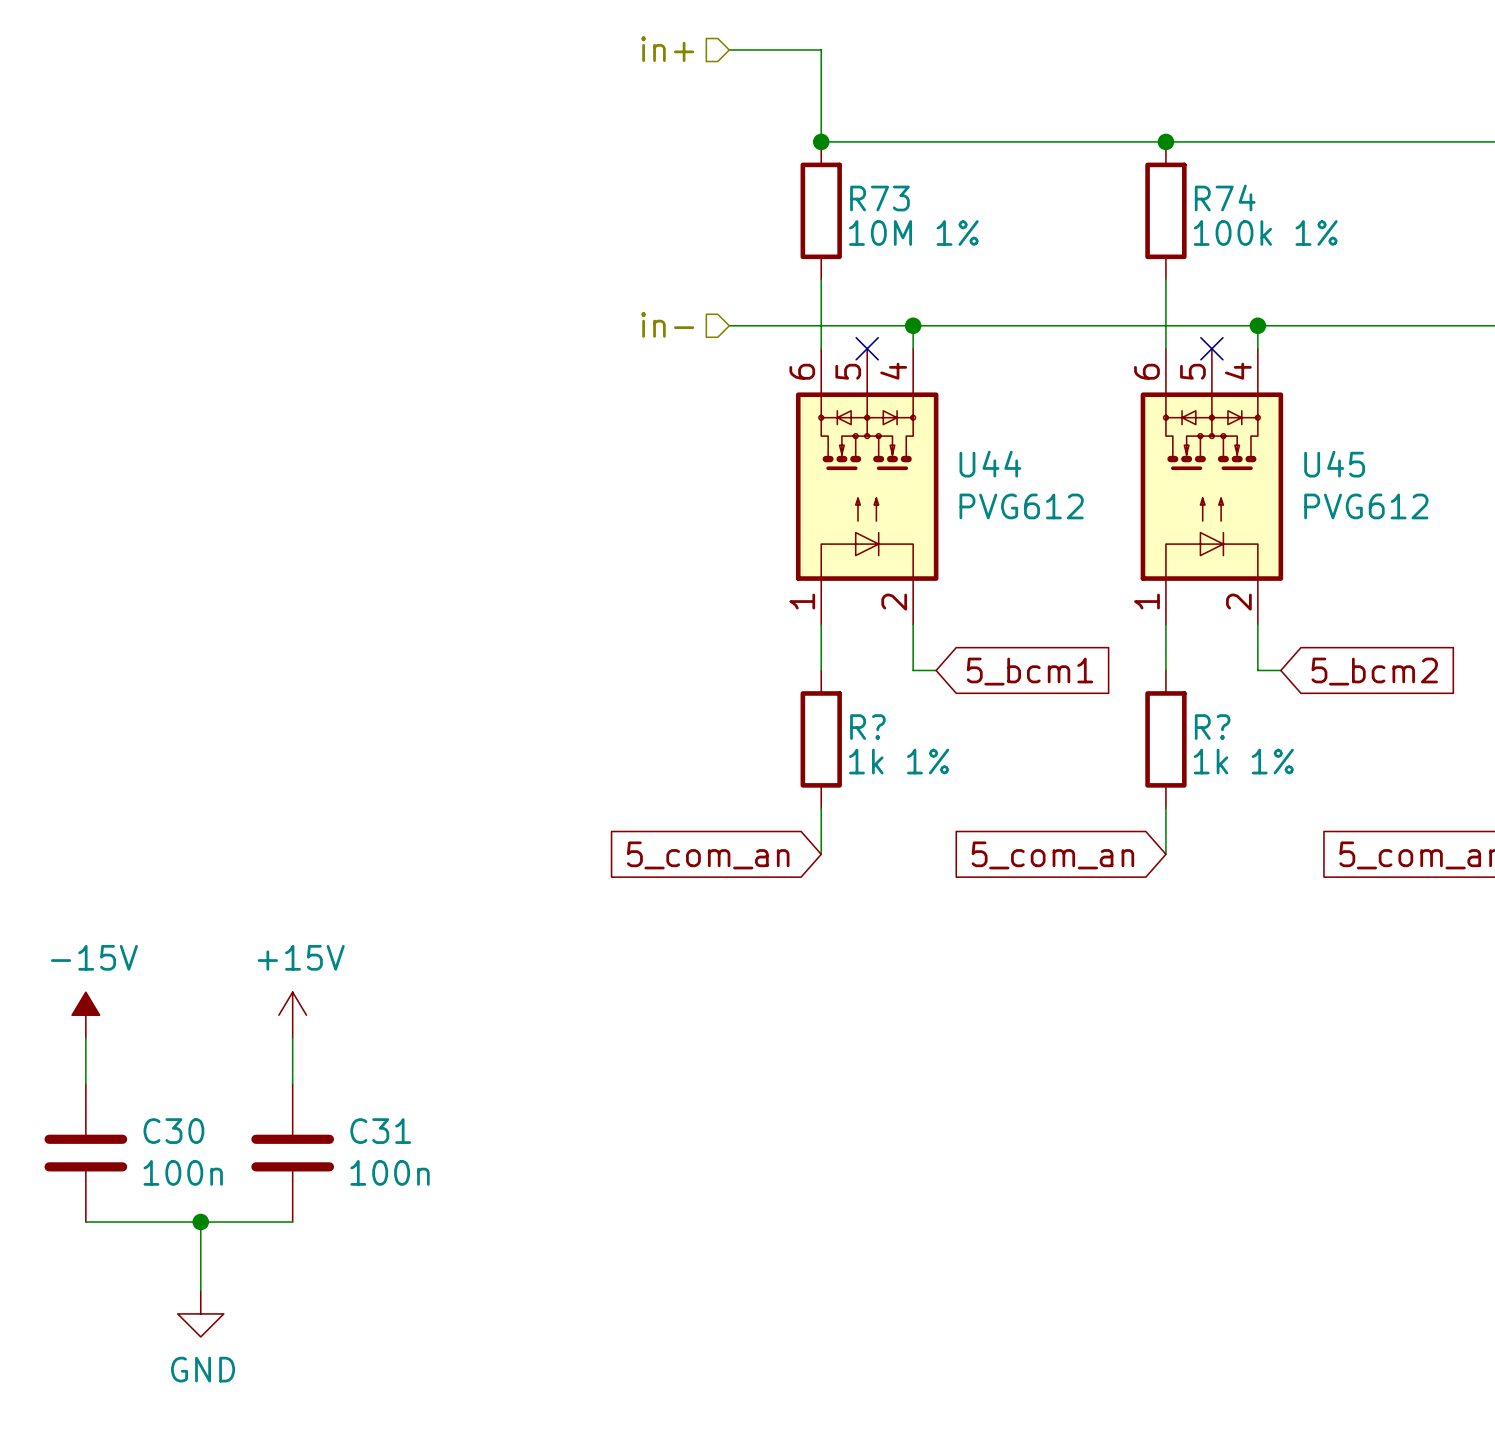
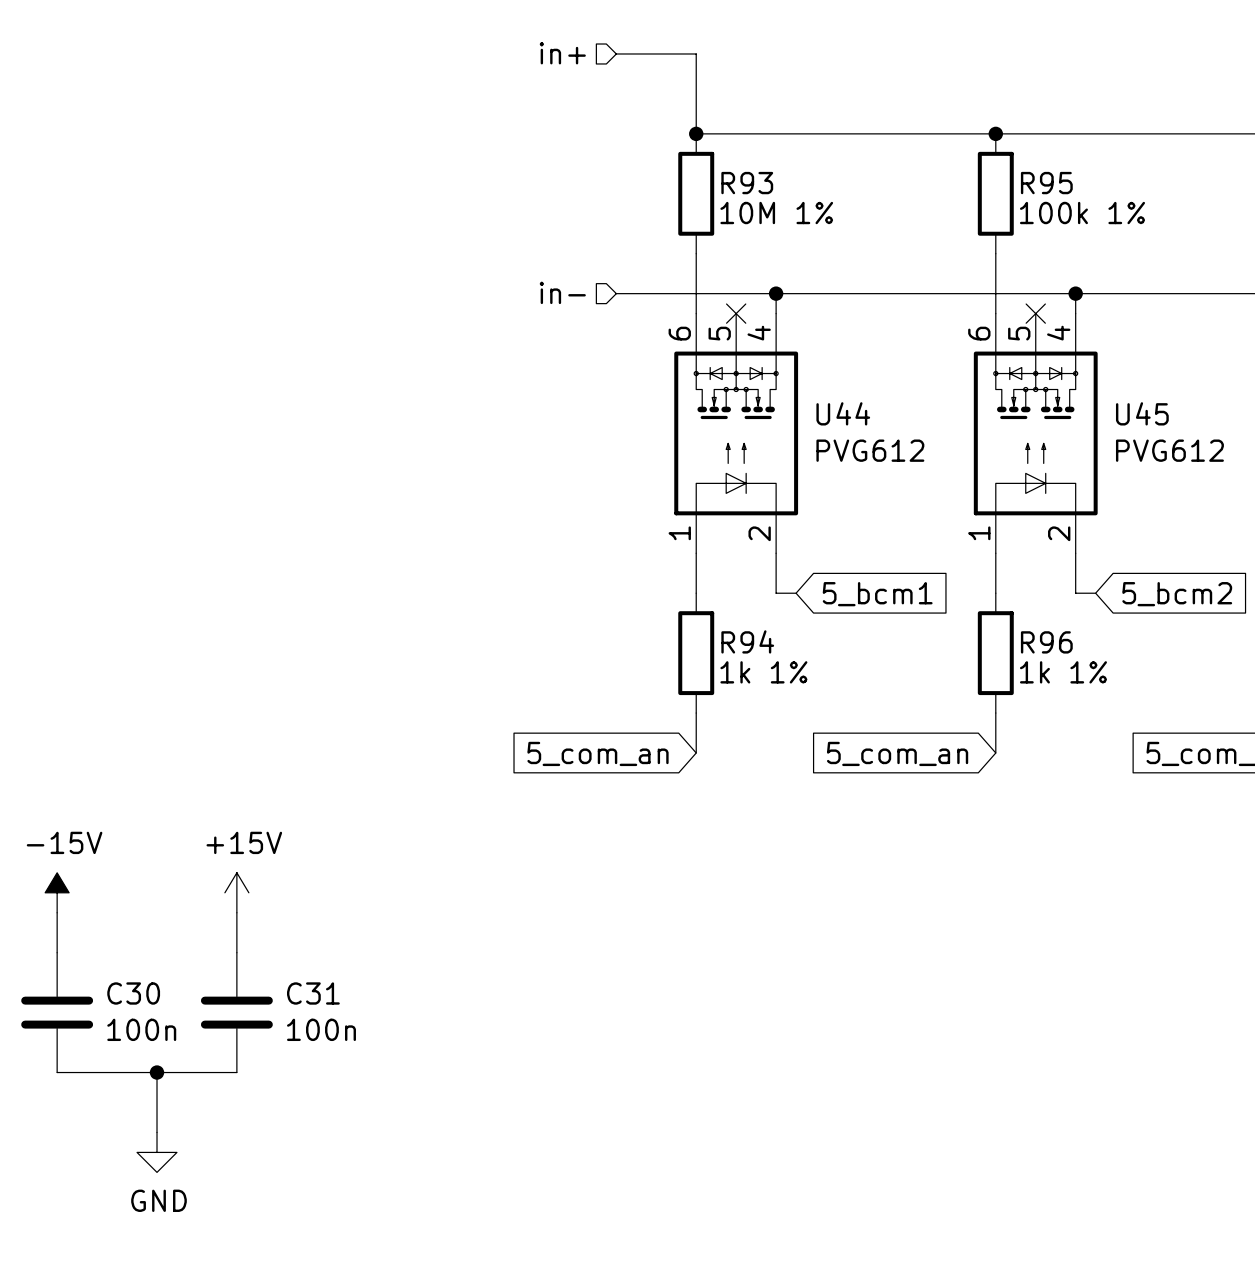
R74 name: R74 (1225, 197) -> R95 (1046, 183)
R73 name: R73 (879, 198) -> R93 (747, 183)
R? name: R? (867, 727) -> R94 (747, 641)
R? name: R? (1212, 727) -> R96 (1046, 642)

